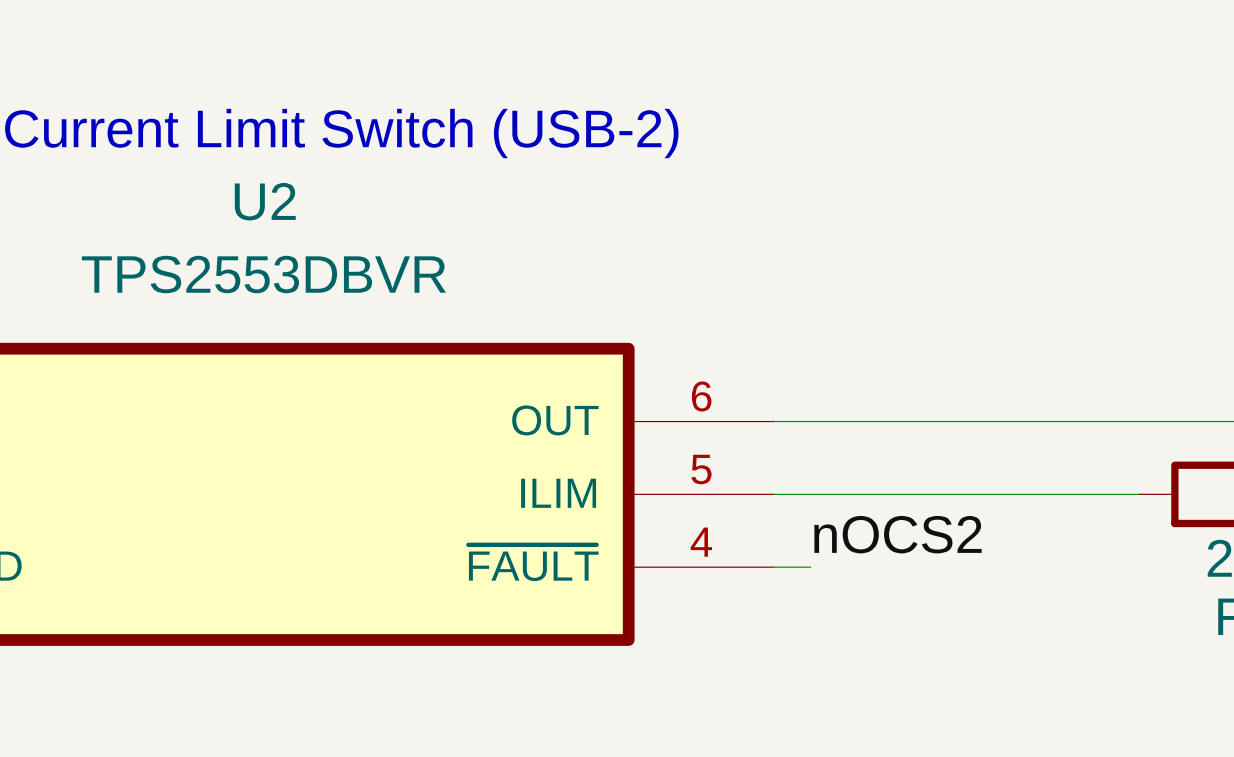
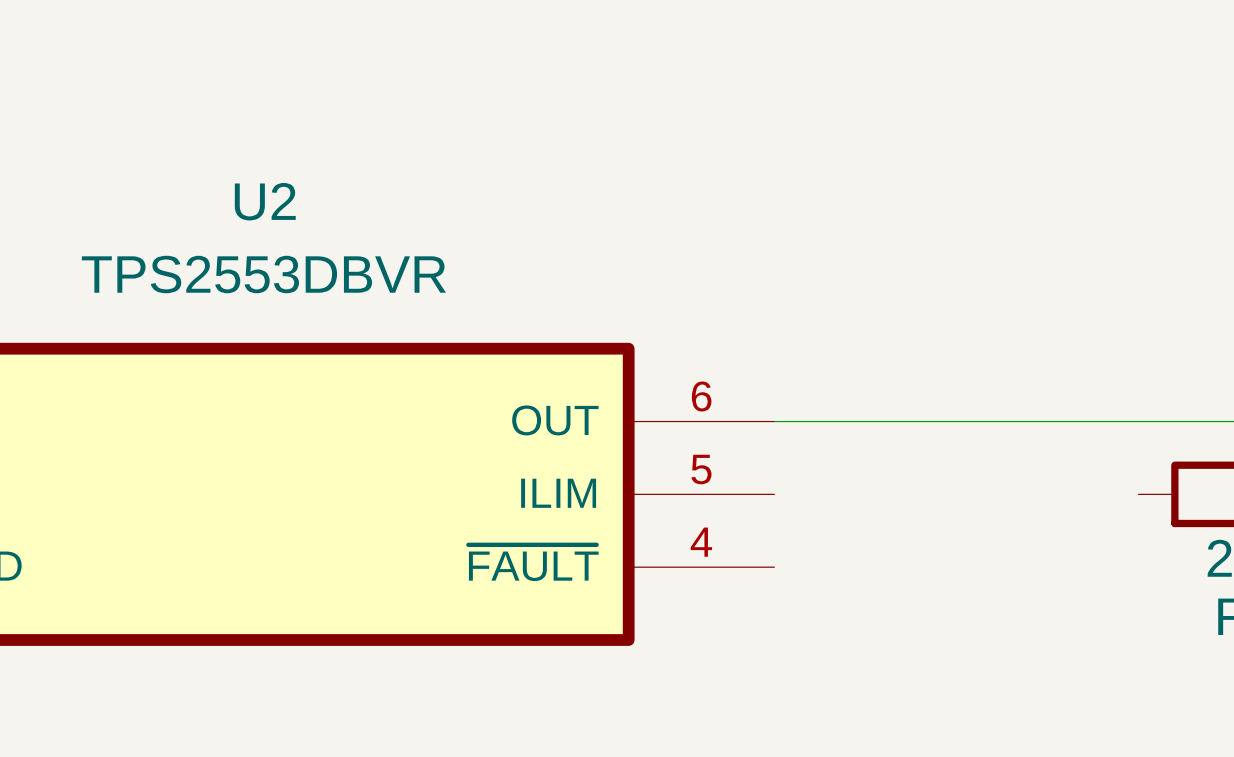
text: Current Limit Switch (USB-2) (341, 133) -> none
wire: (774, 494) (1138, 494) -> none
label: nOCS2 (897, 534) -> none
wire: (774, 567) (810, 567) -> none

